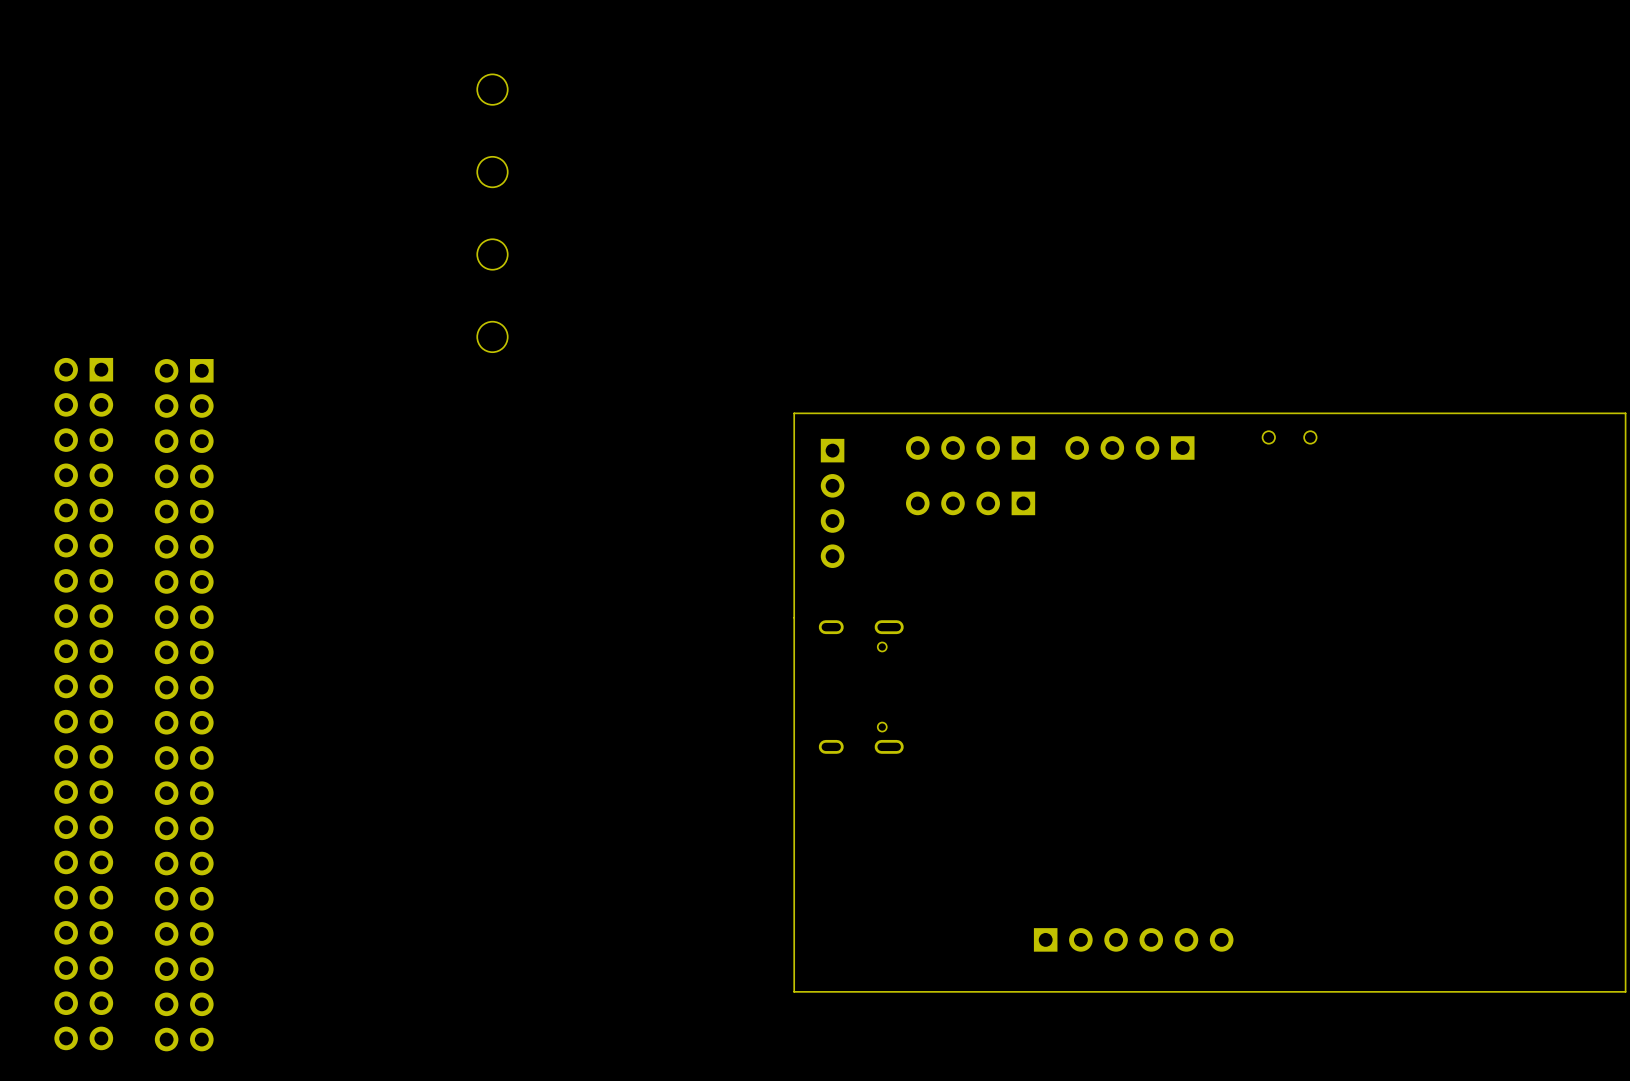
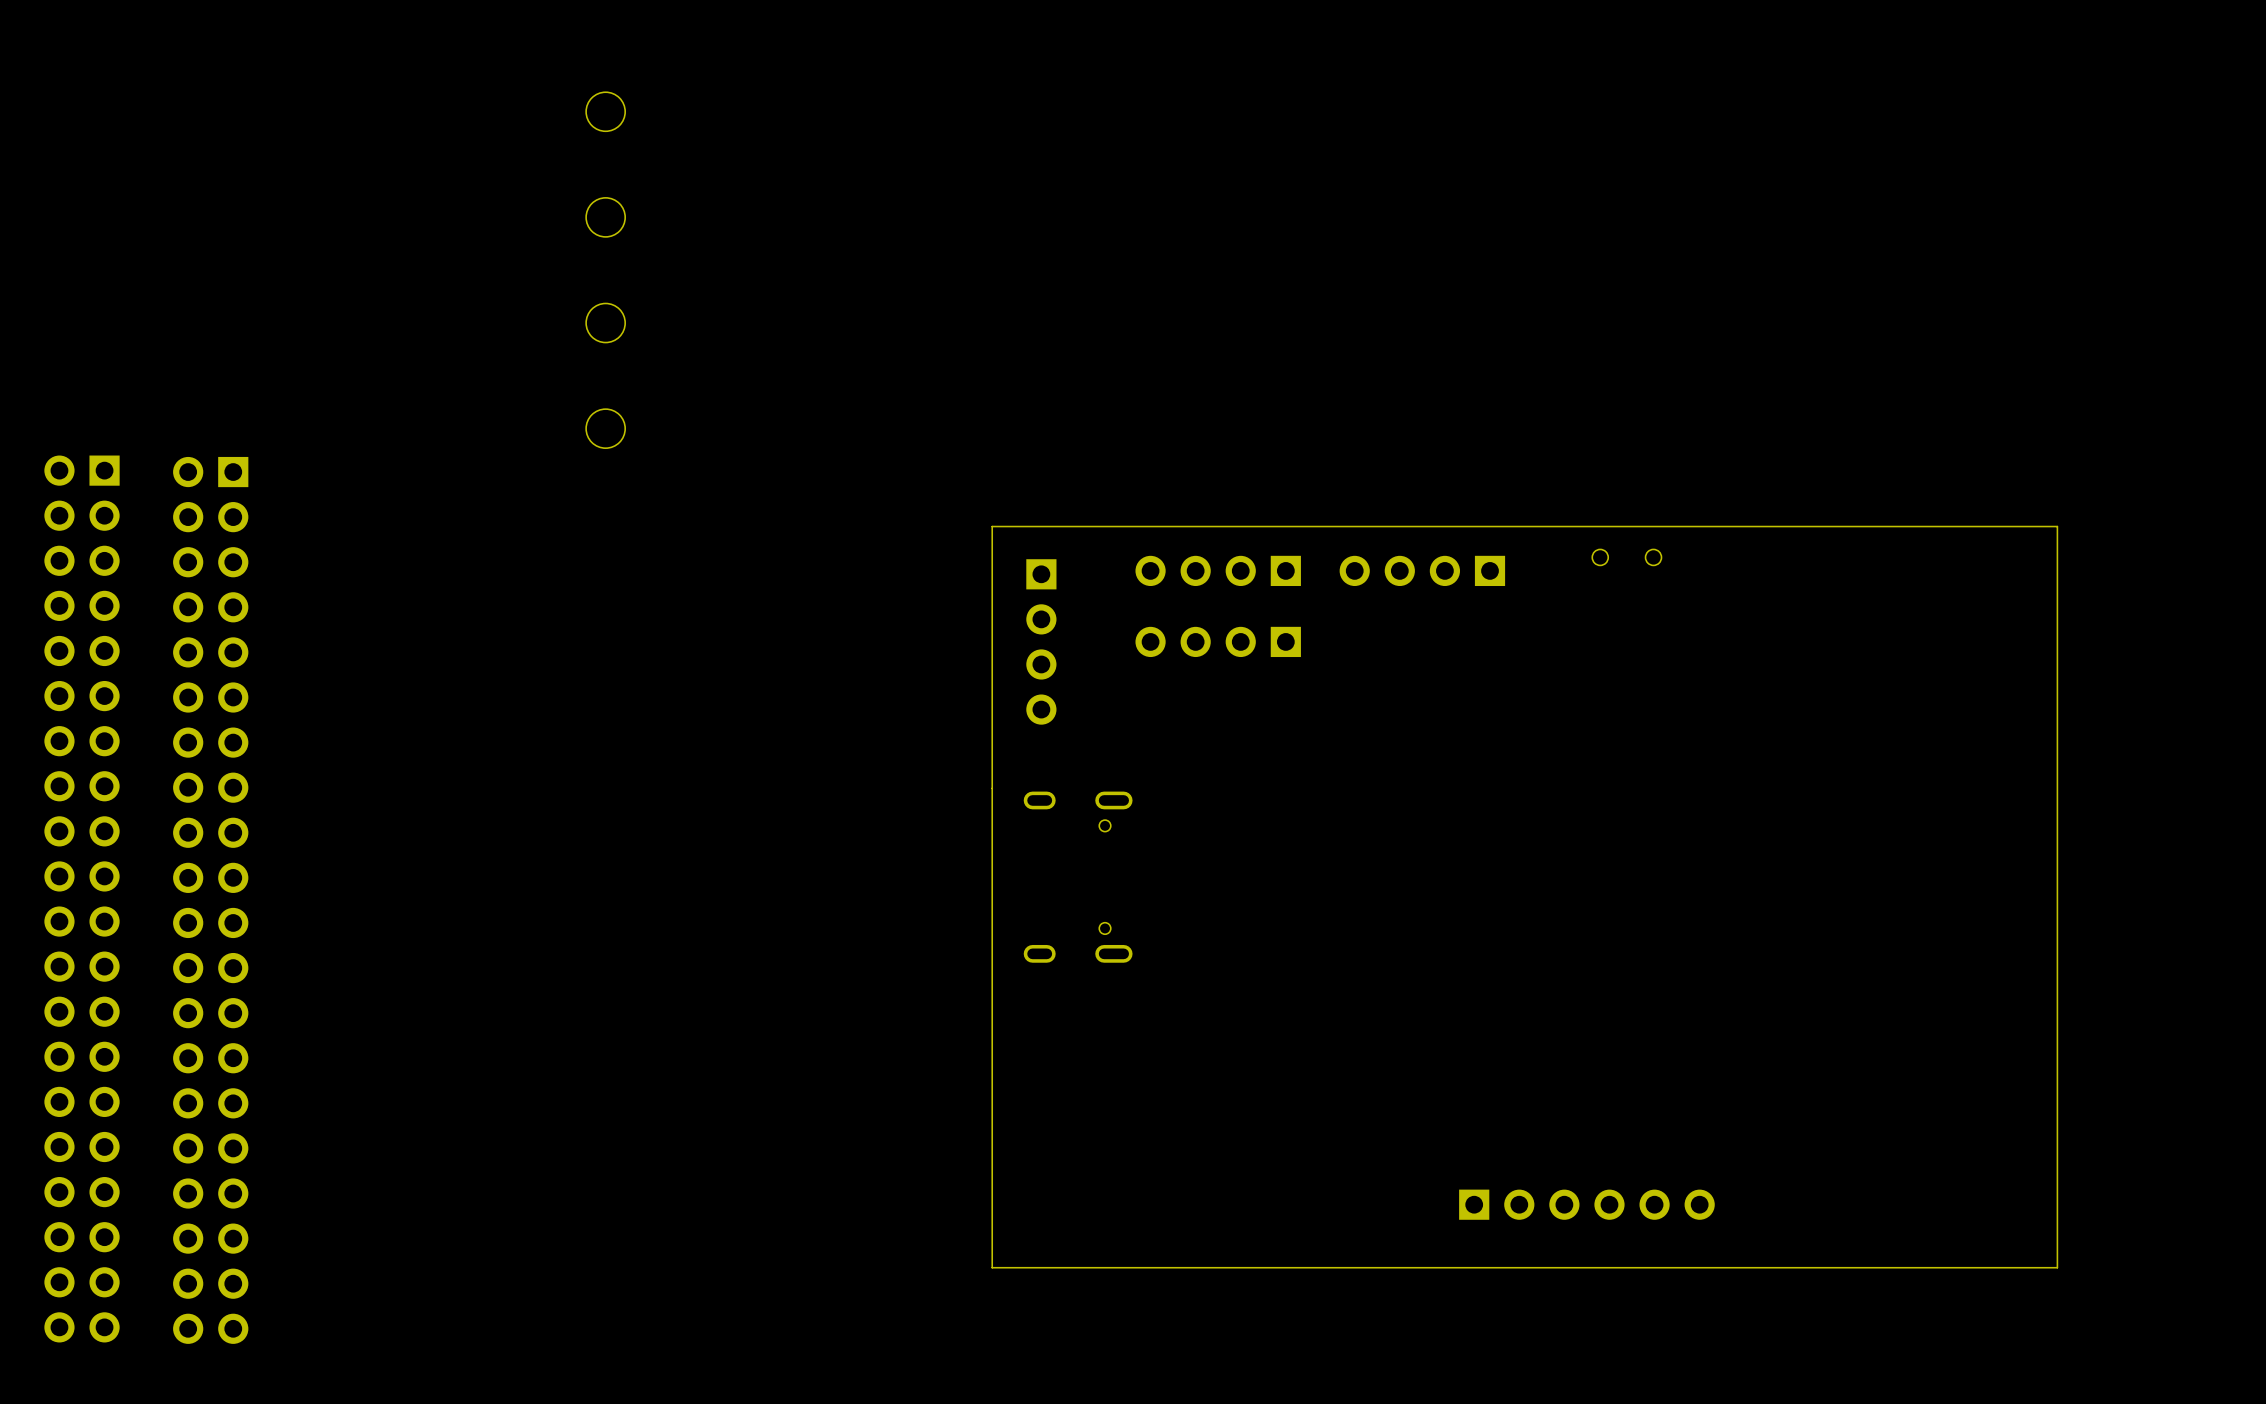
part position: (1133, 939) -> (1586, 1204)

